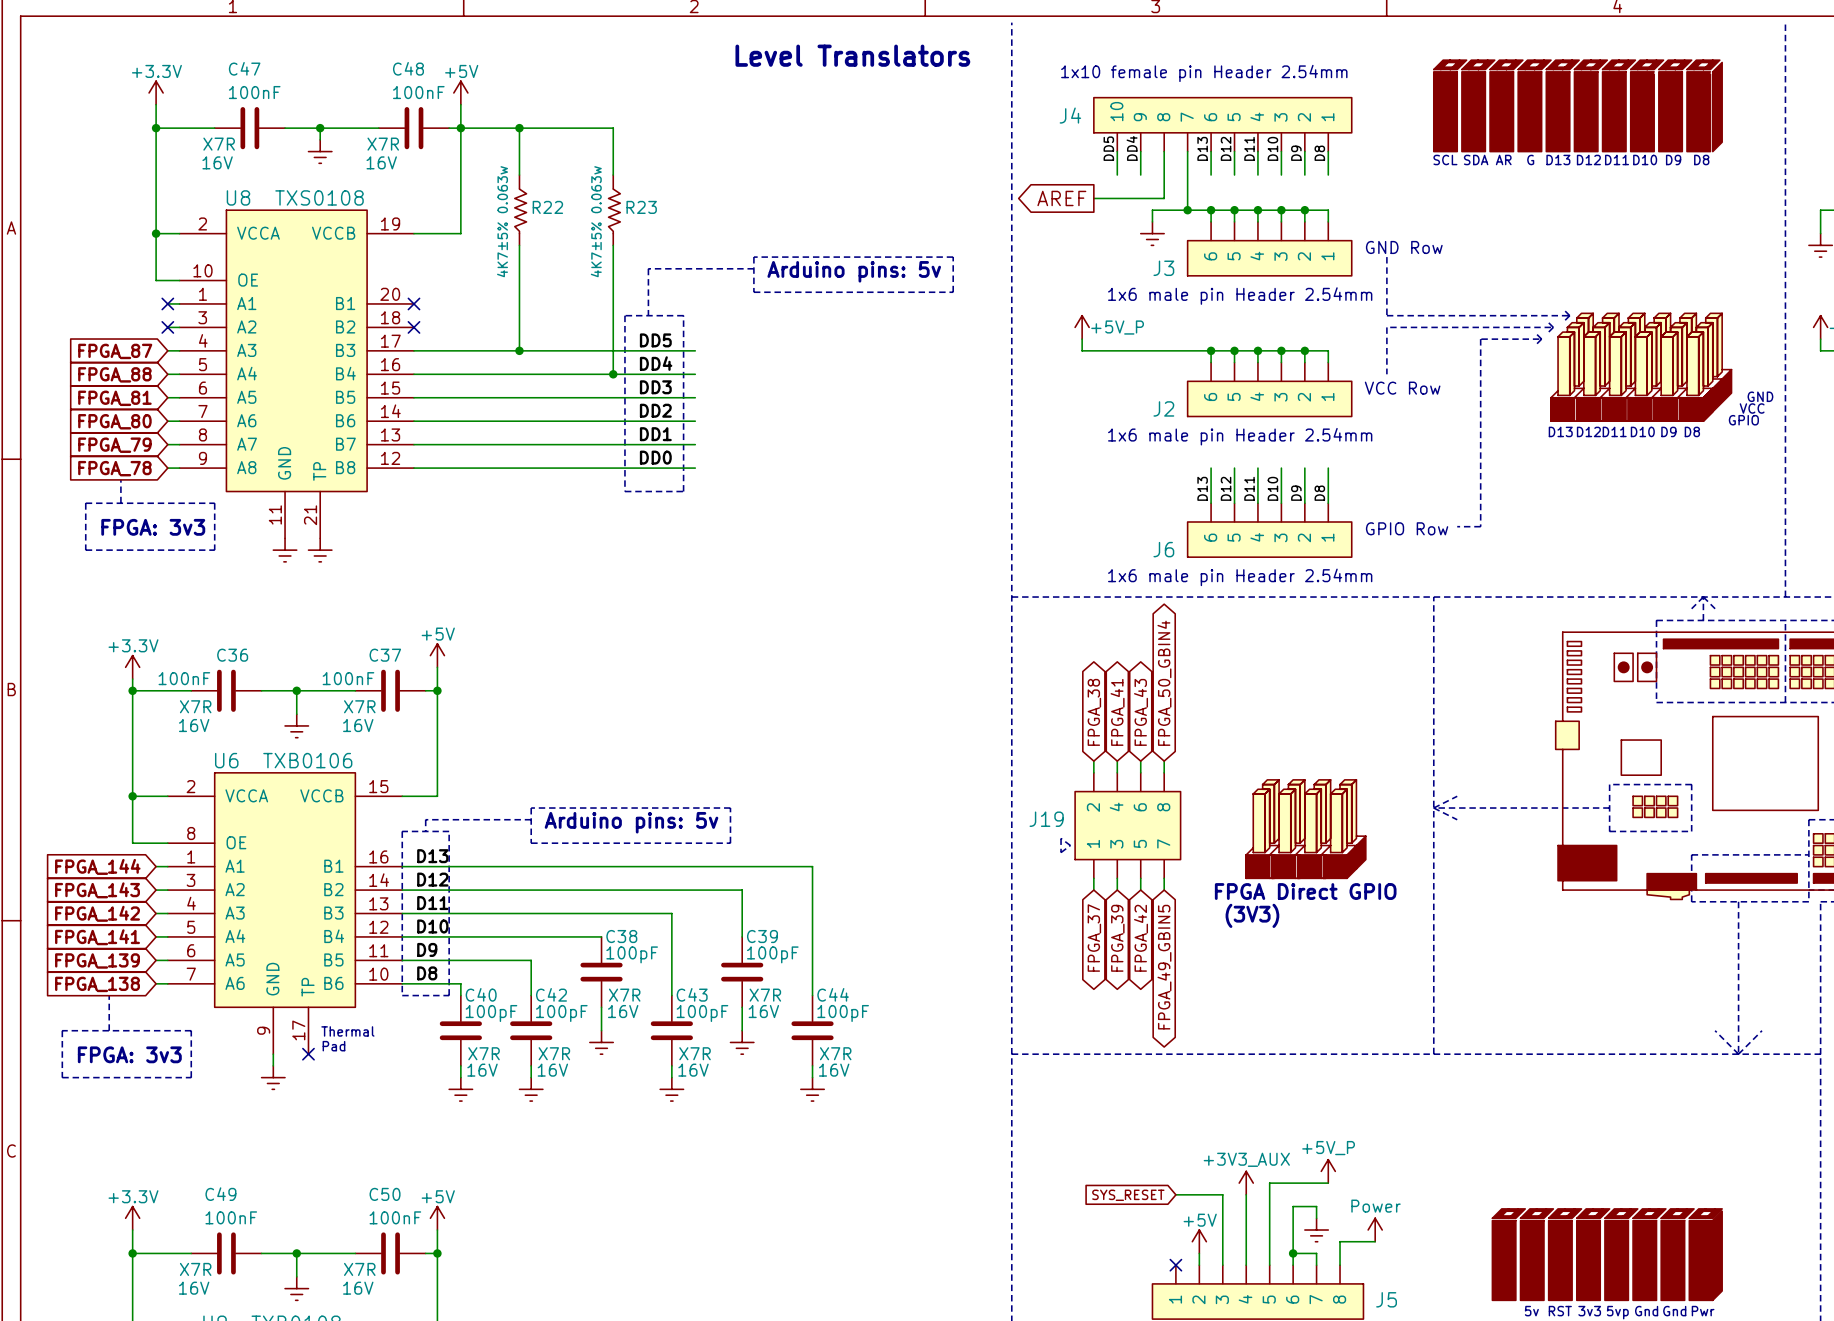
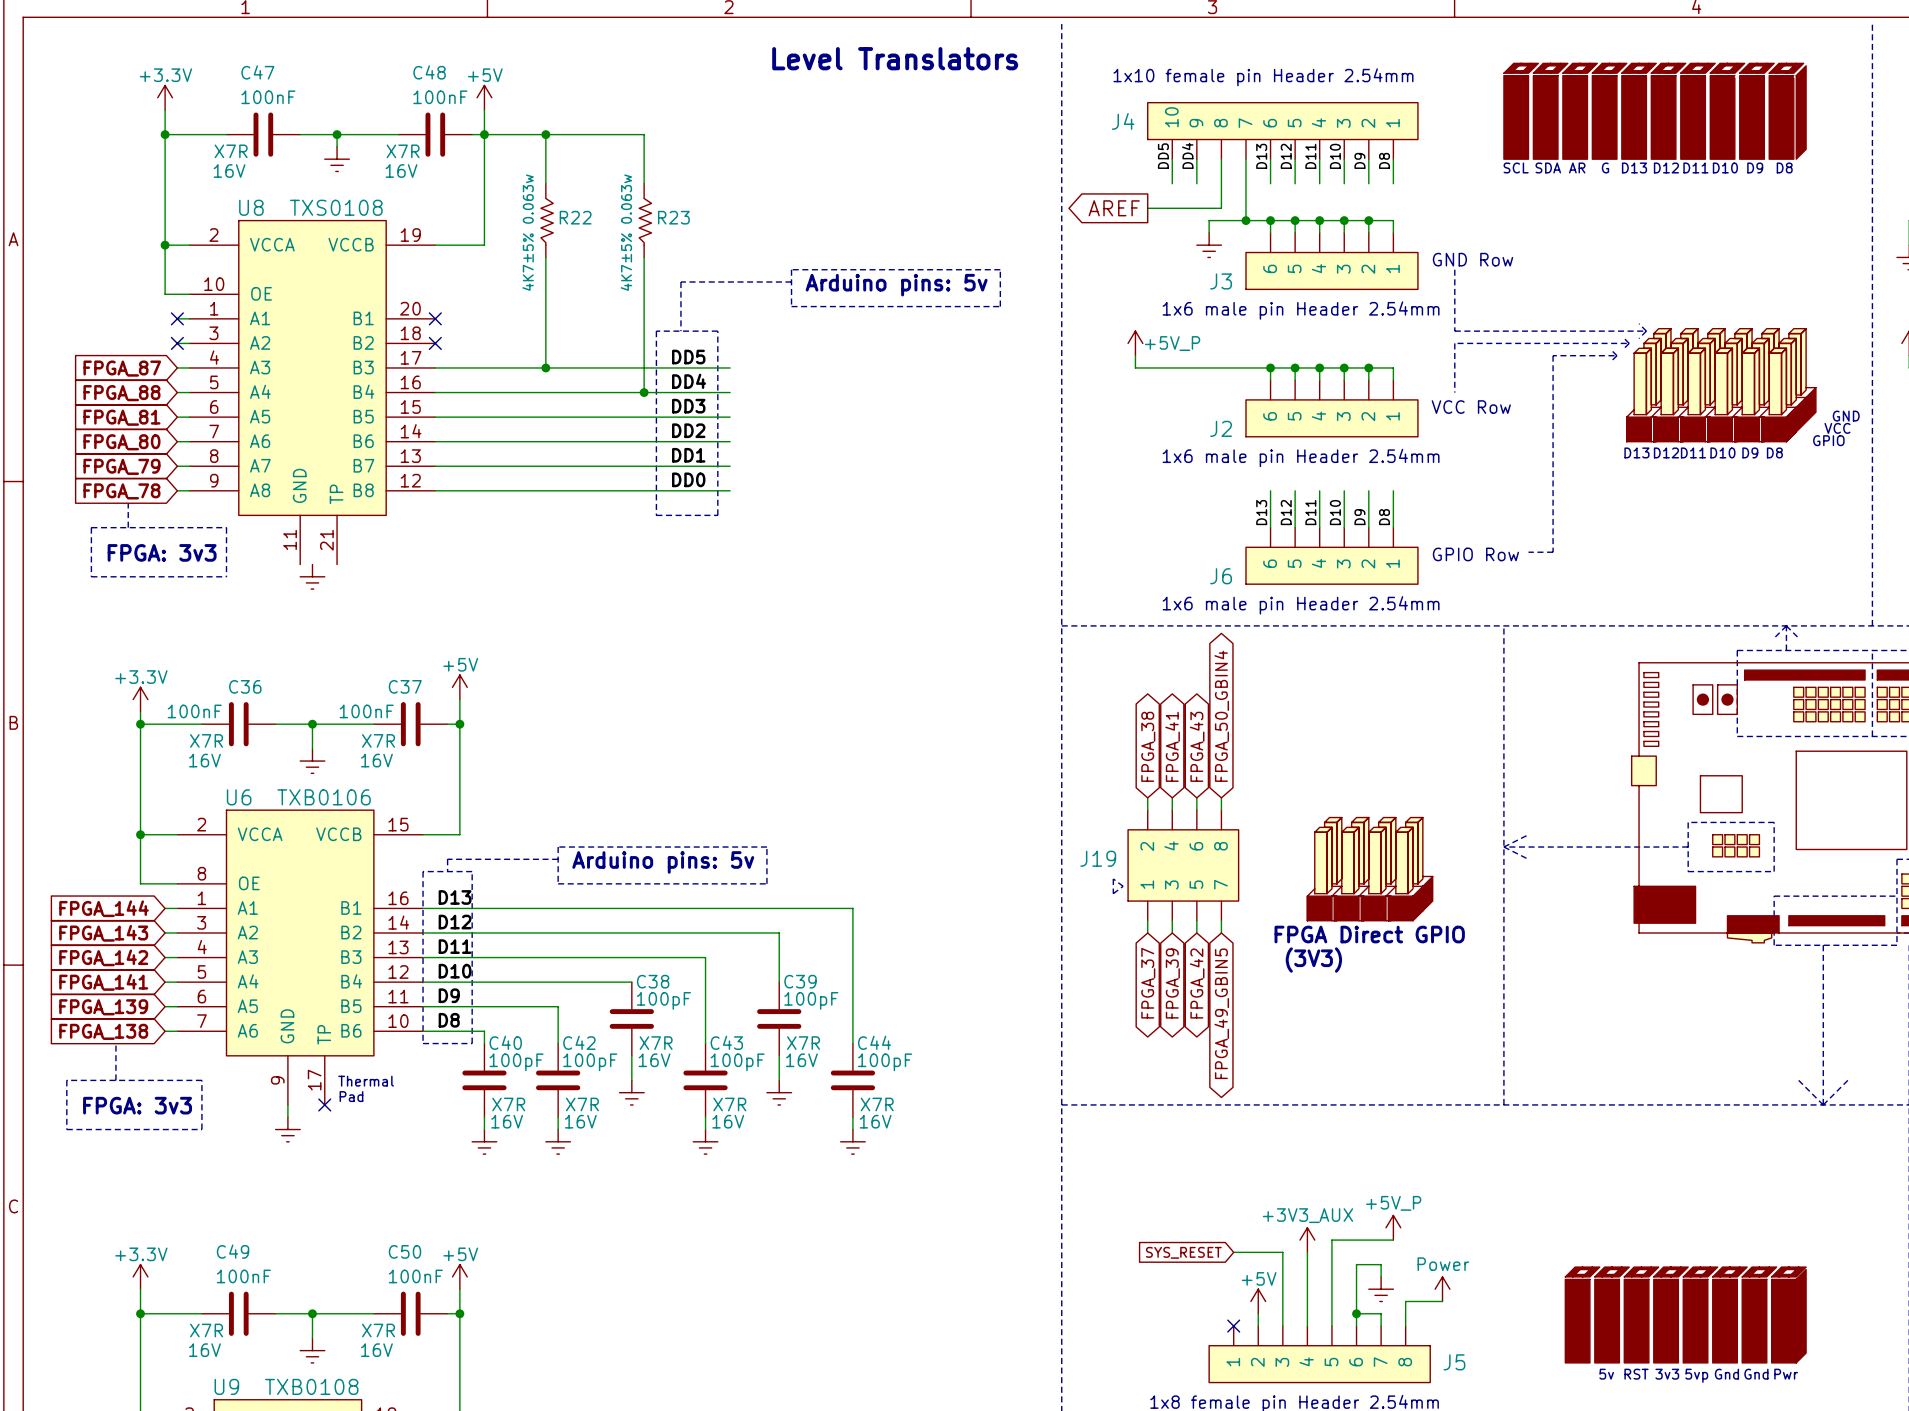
power symbol: (285, 550) -> none
power symbol: none -> (312, 576)
power symbol: (320, 550) -> none

